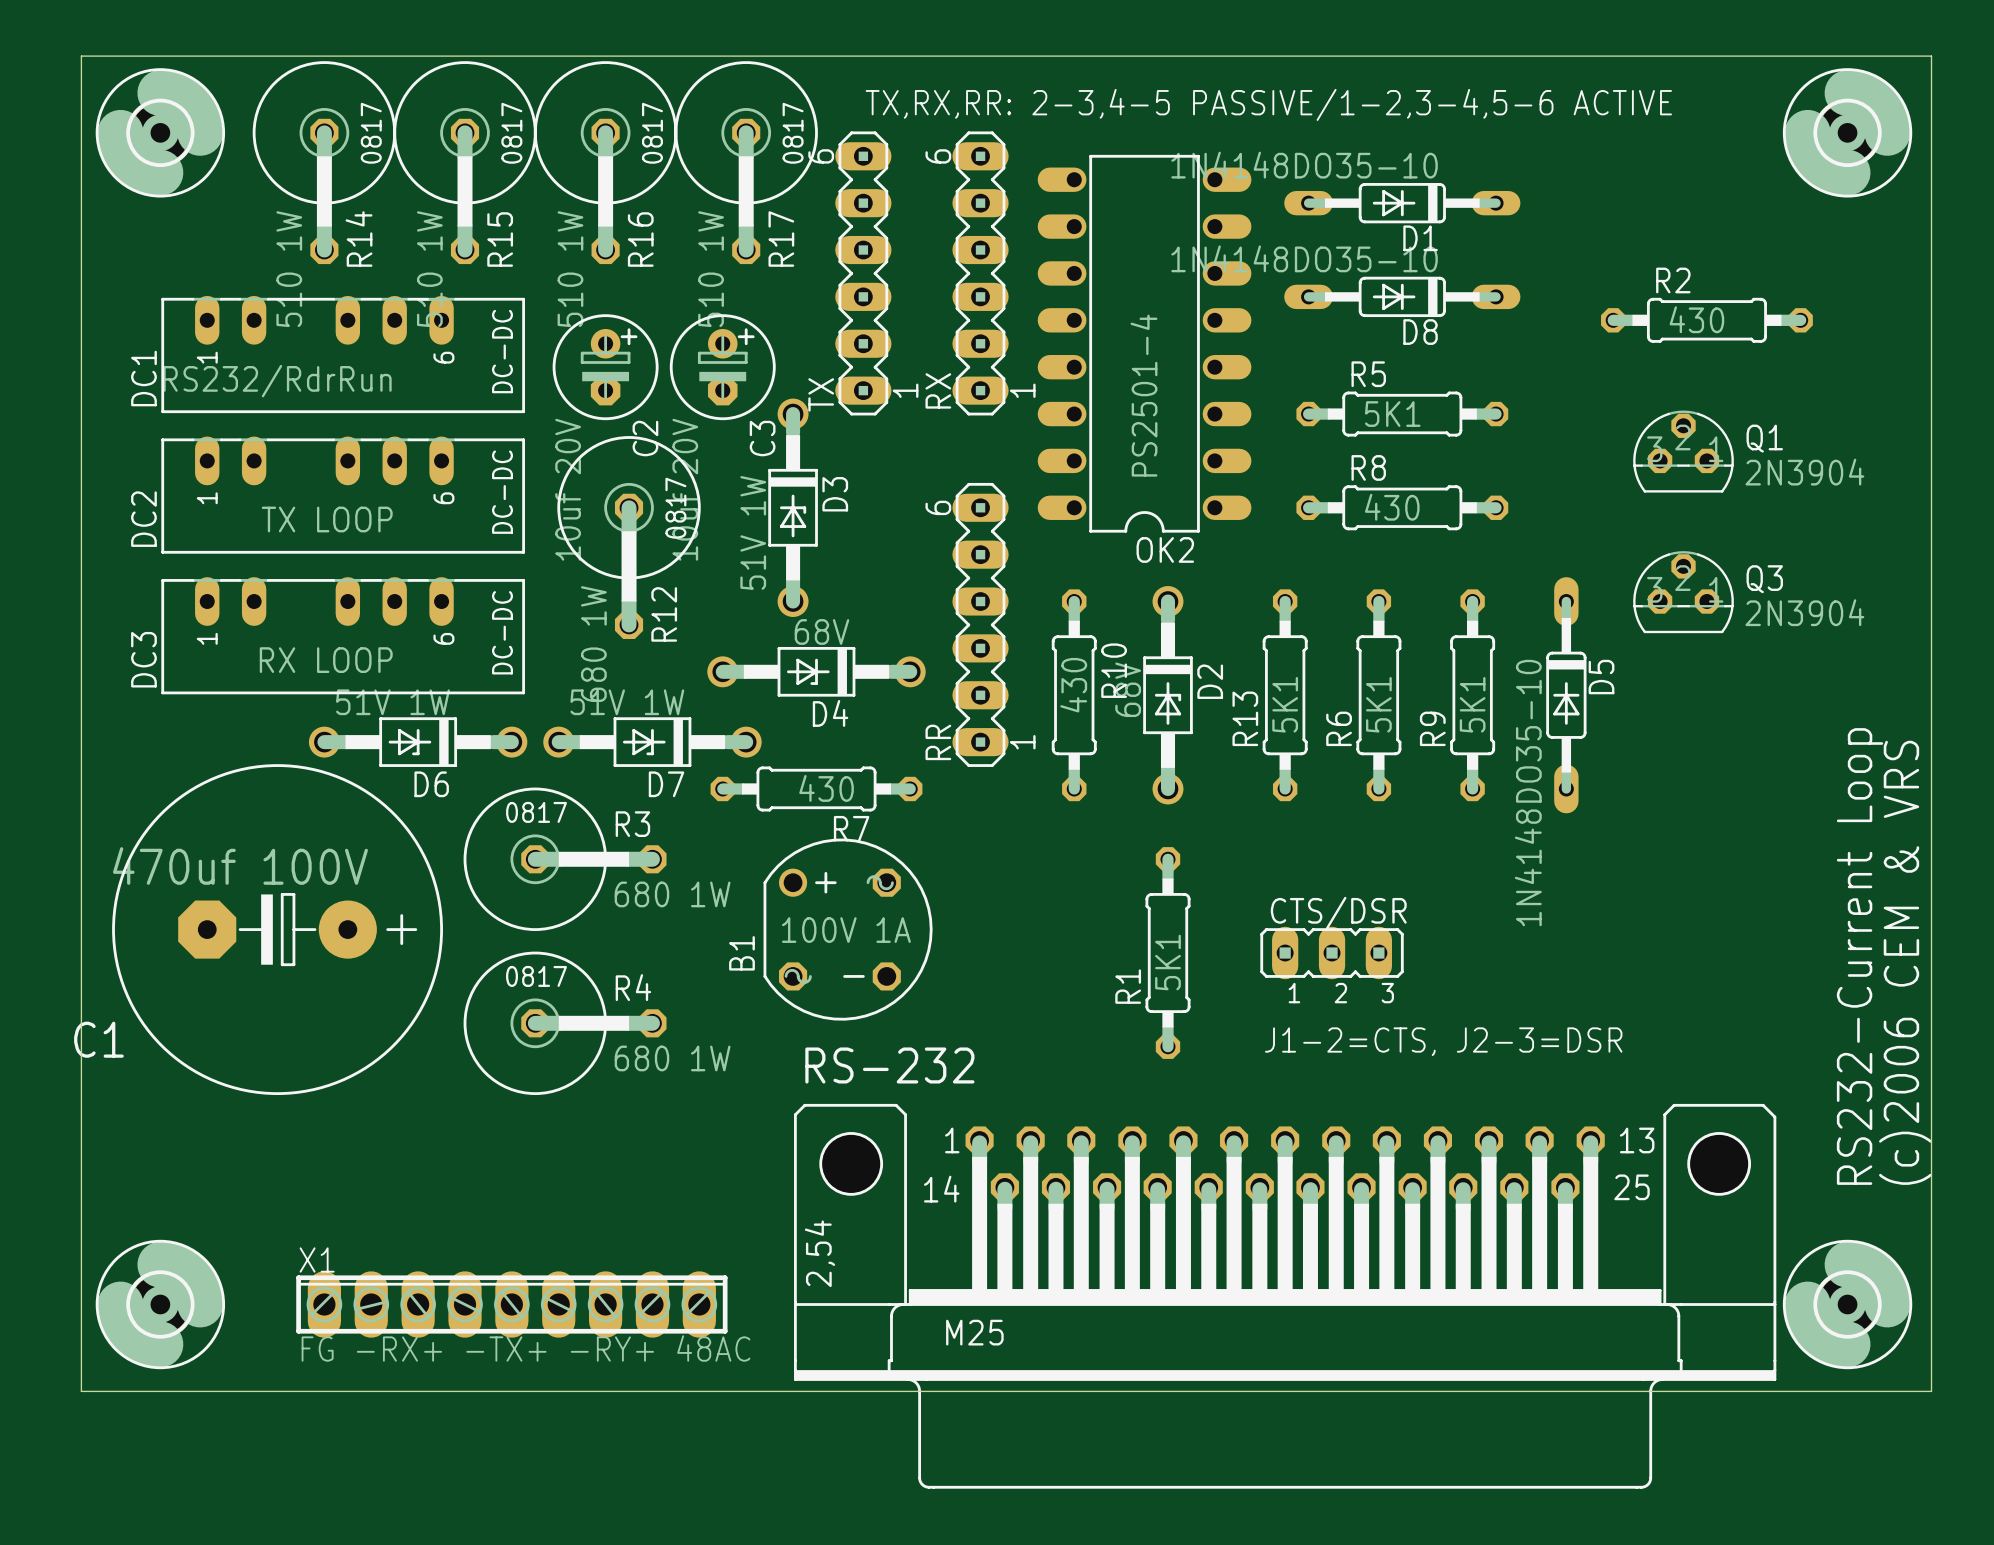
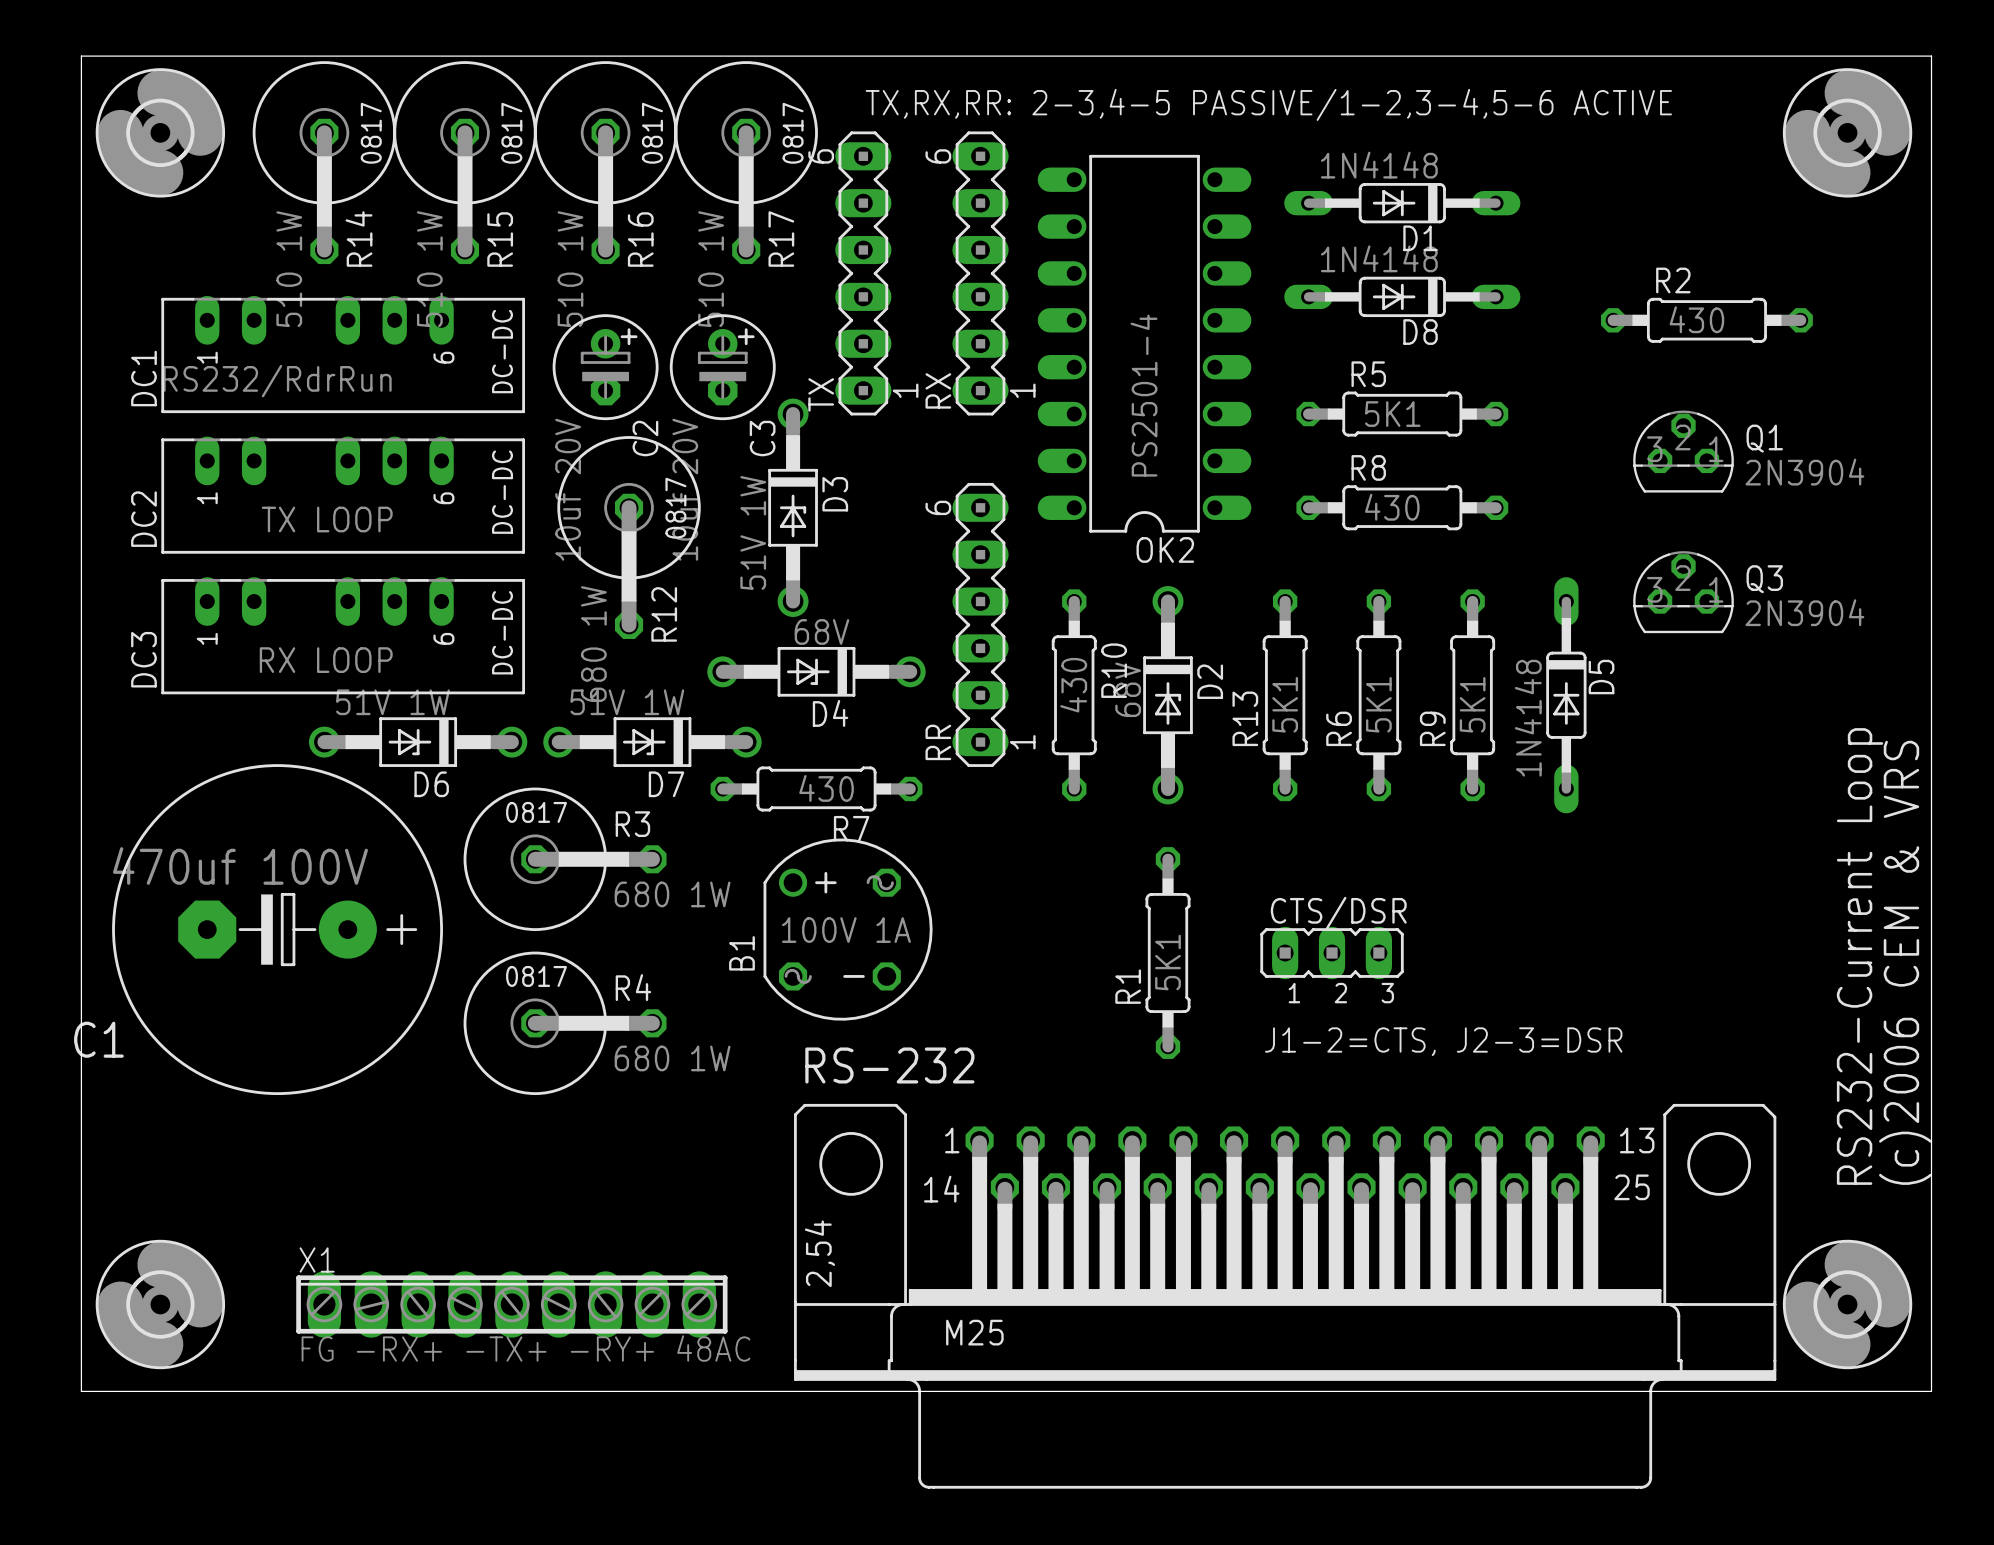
D1 value: 1N4148DO35-10 (1304, 165) -> 1N4148 (1379, 165)
D8 value: 1N4148DO35-10 (1304, 258) -> 1N4148 (1379, 258)
D5 value: 1N4148DO35-10 (1528, 793) -> 1N4148 (1528, 718)

